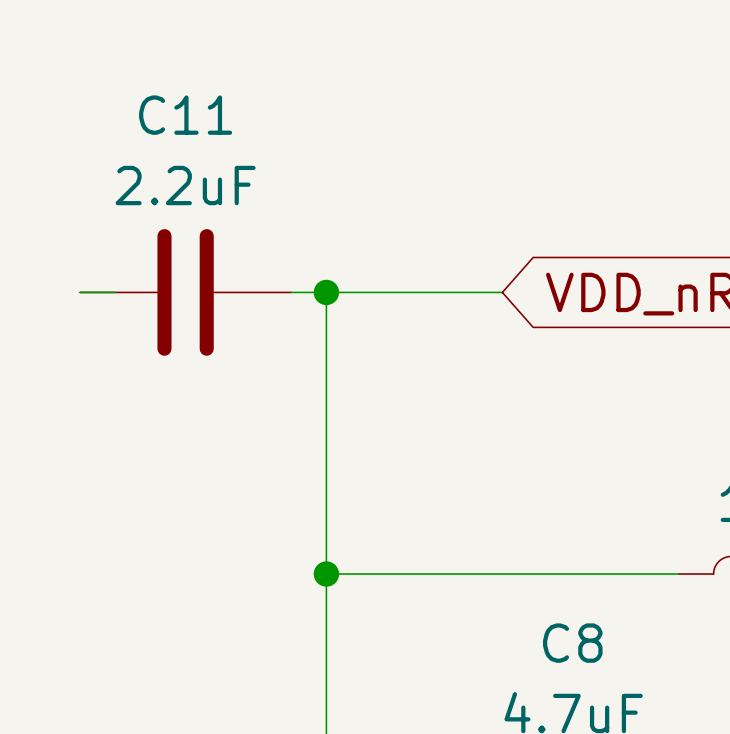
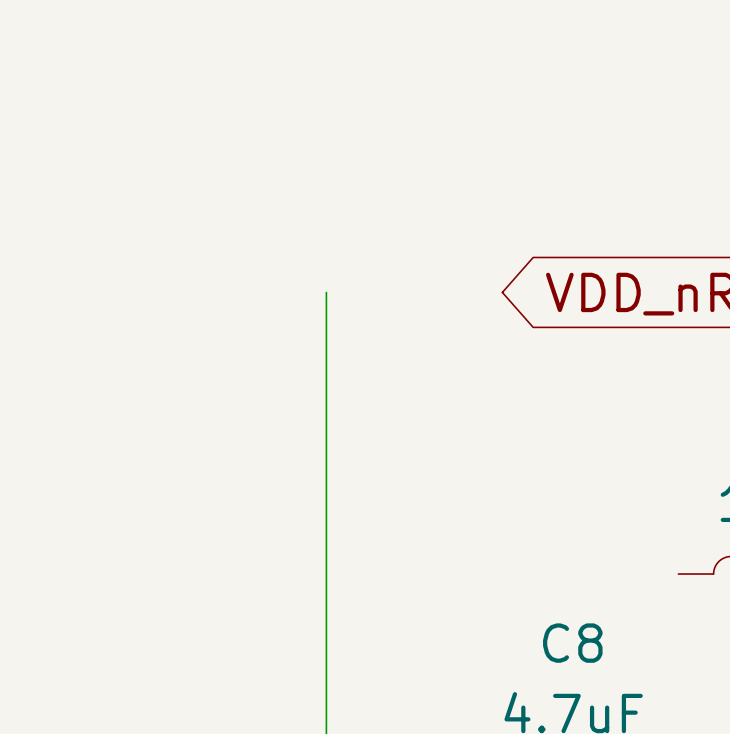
wire: (80, 292) (115, 292) -> none
C11: 2.2uF (185, 292) -> none
wire: (291, 292) (502, 292) -> none
junction: (326, 292) -> none
wire: (326, 574) (678, 574) -> none
junction: (326, 574) -> none

